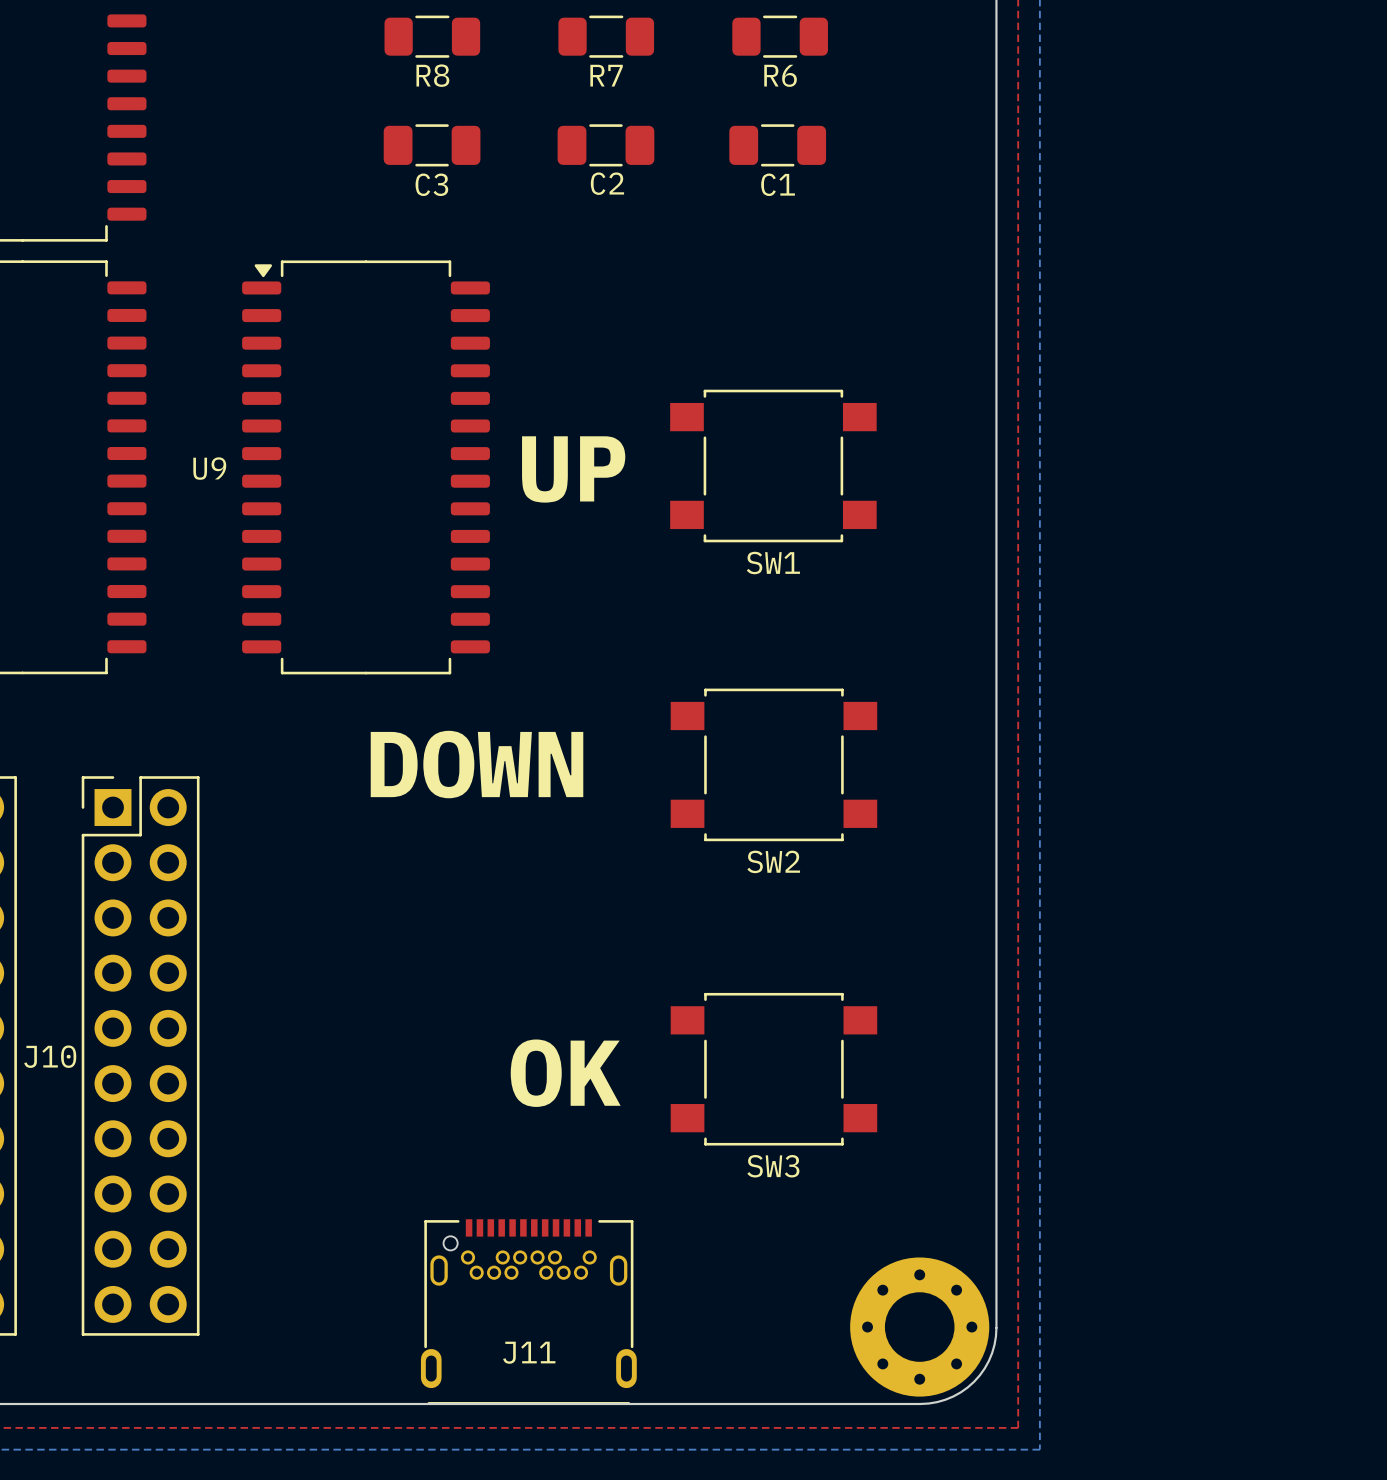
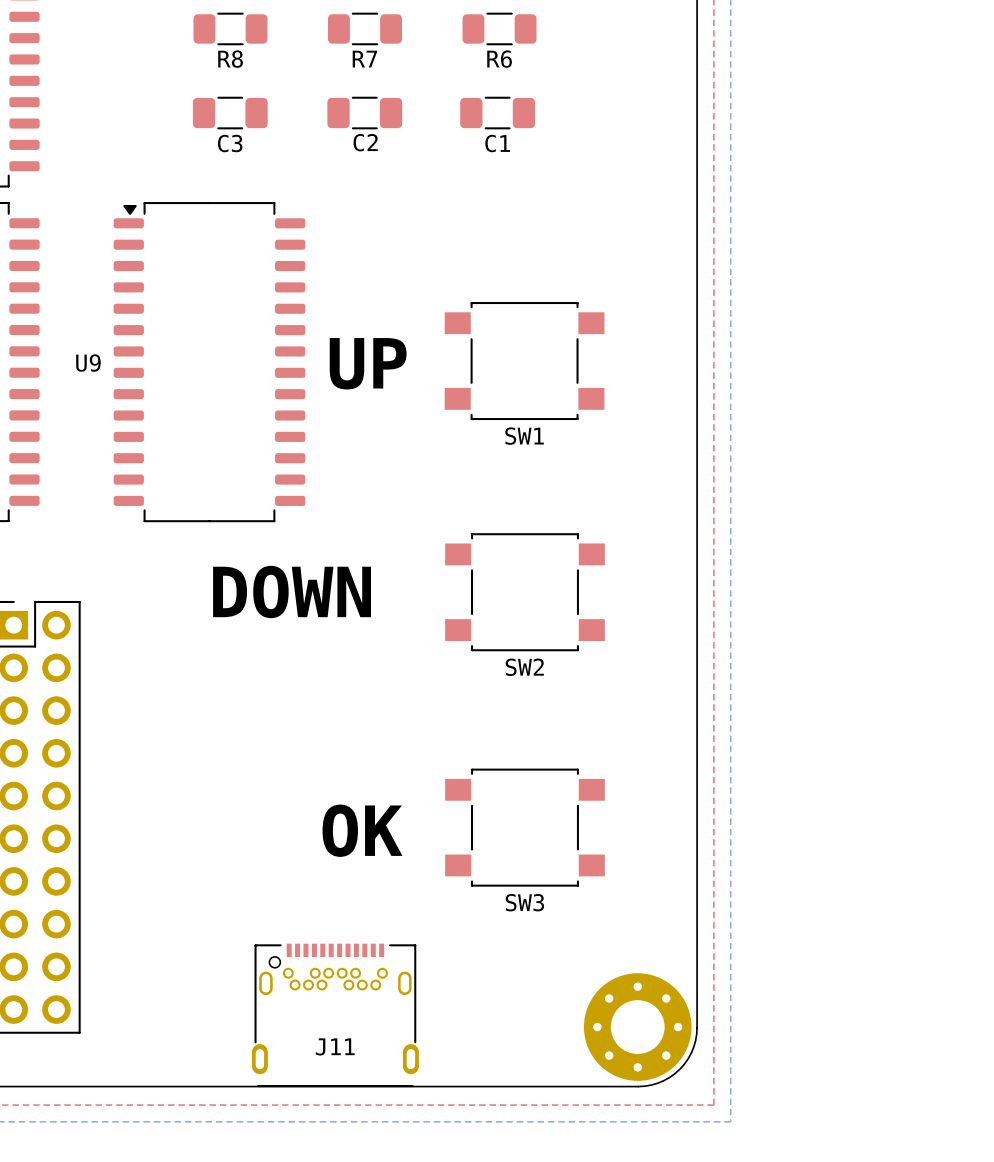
R8 position: (432, 36) -> (230, 28)
R7 position: (606, 36) -> (365, 28)
R6 position: (780, 36) -> (499, 28)
C3 position: (432, 145) -> (230, 113)
C2 position: (605, 145) -> (364, 113)
C1 position: (777, 145) -> (497, 113)

